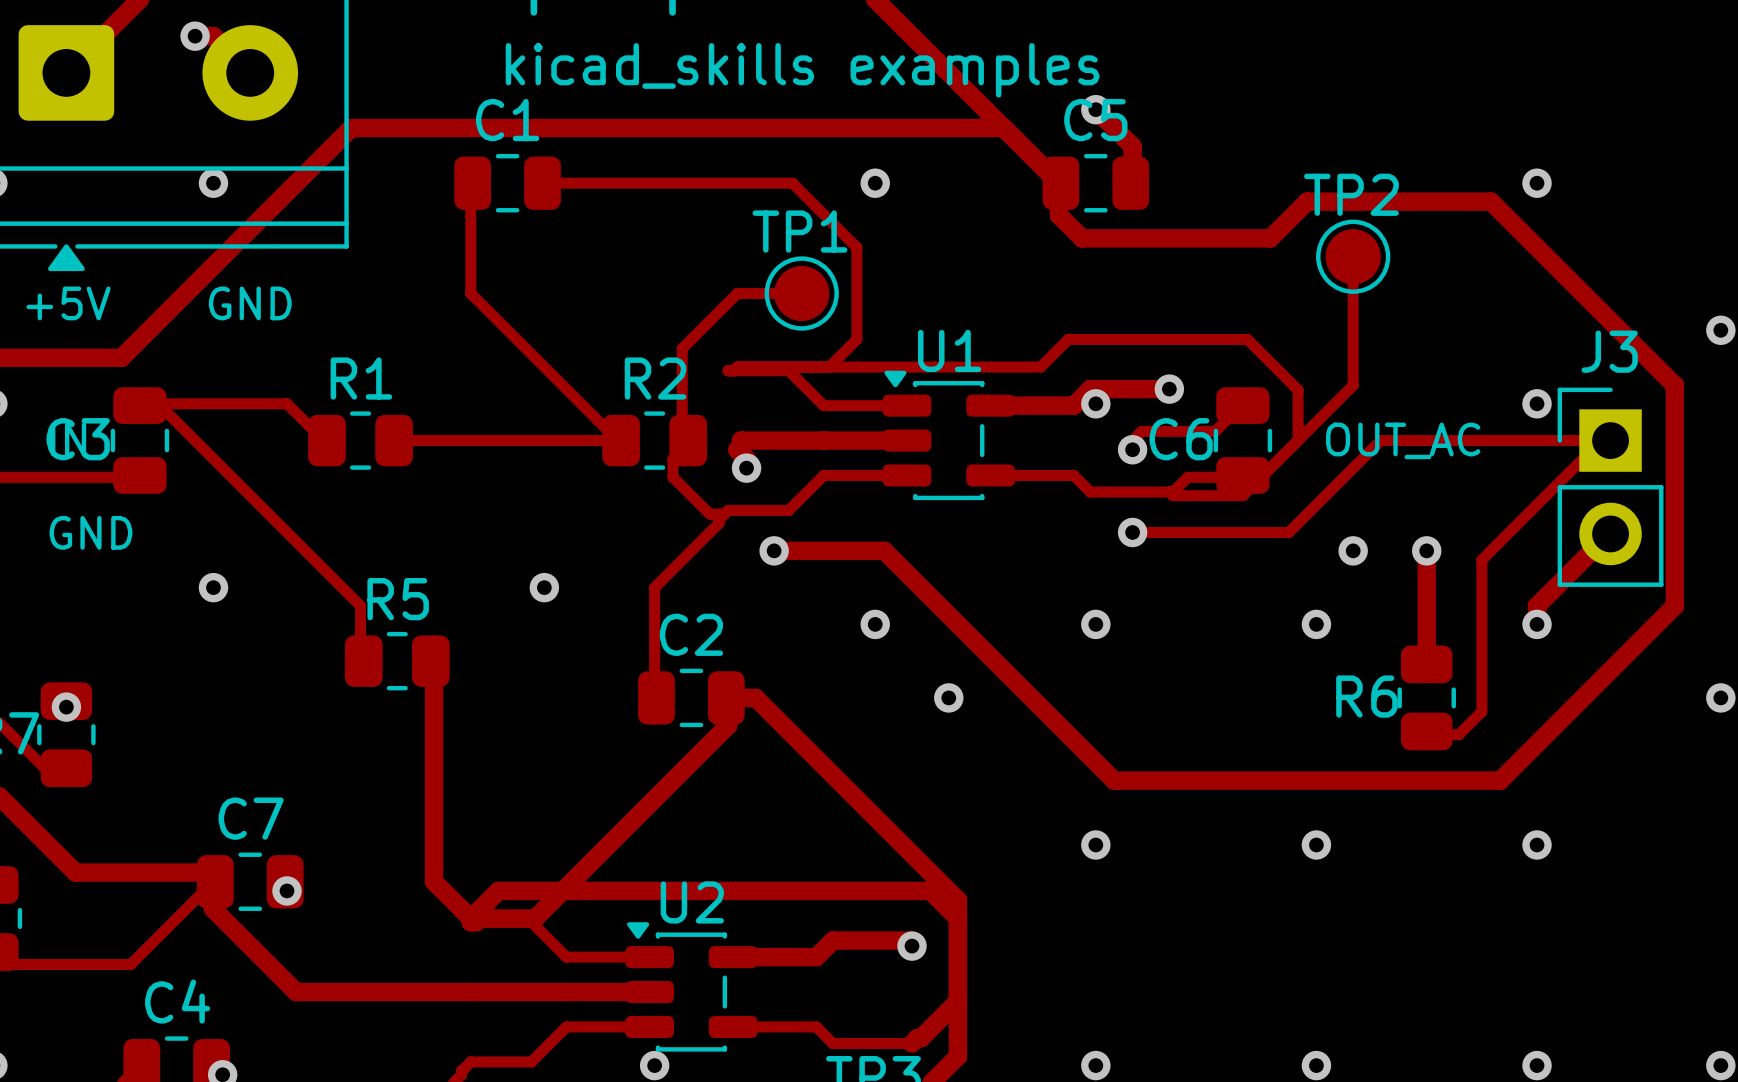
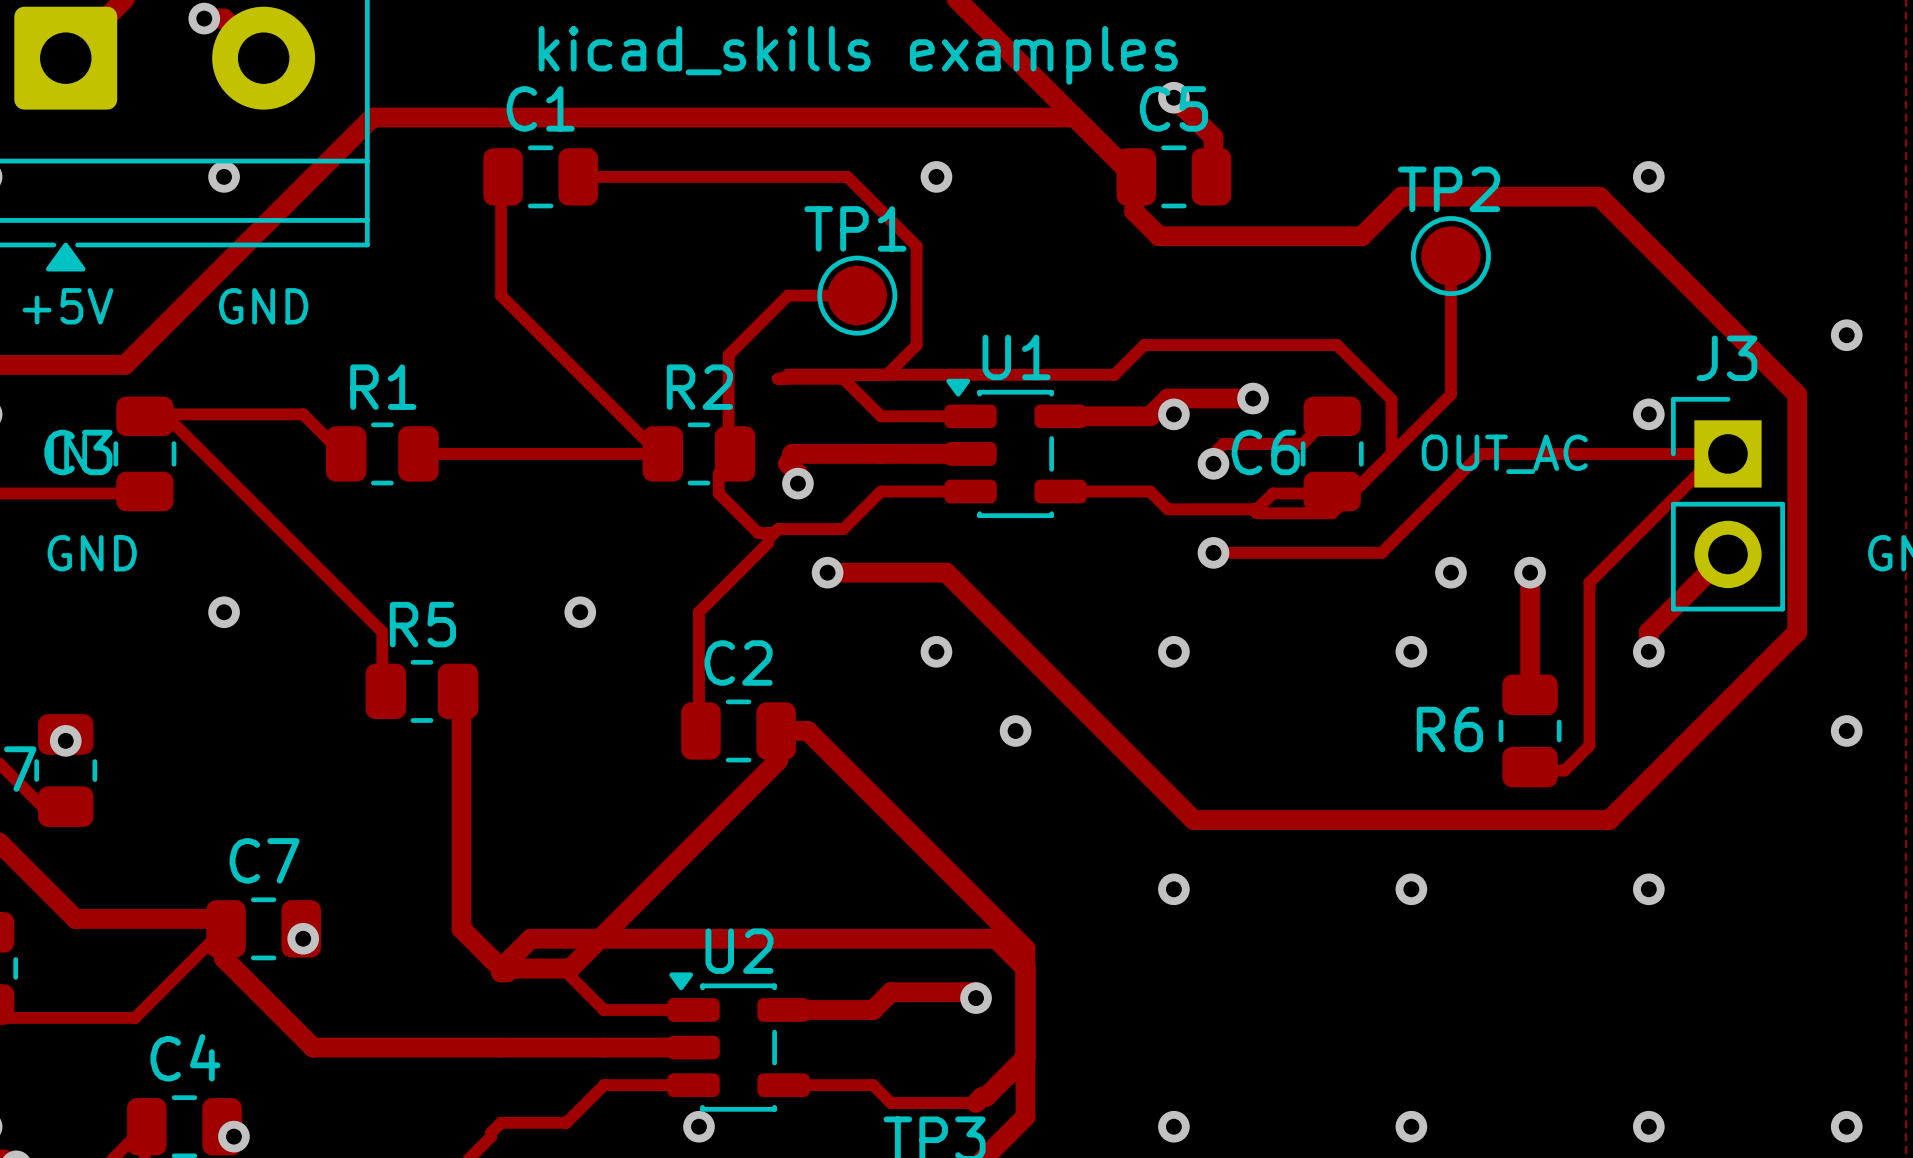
R6 name position: R6 (1366, 696) -> R6 (1449, 729)

